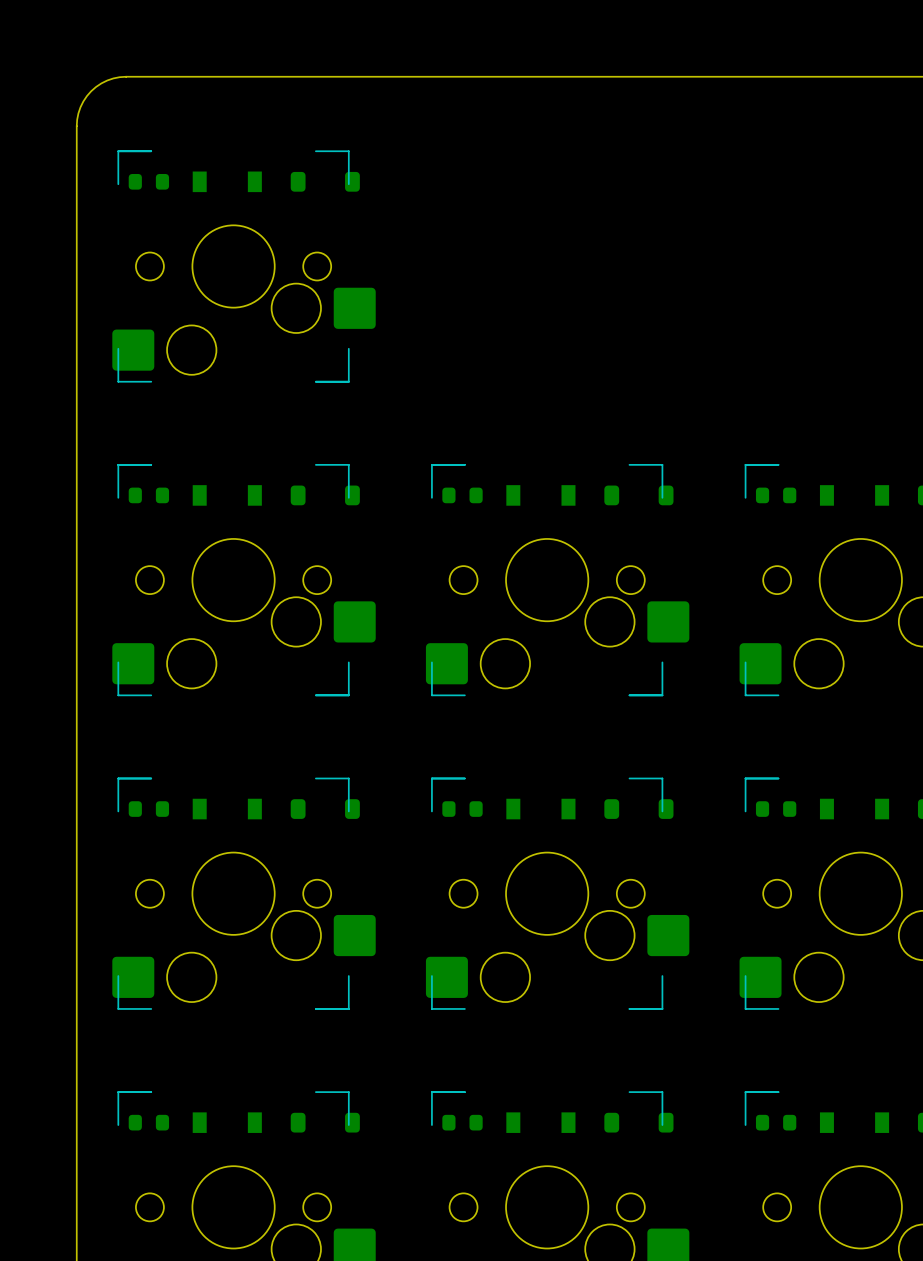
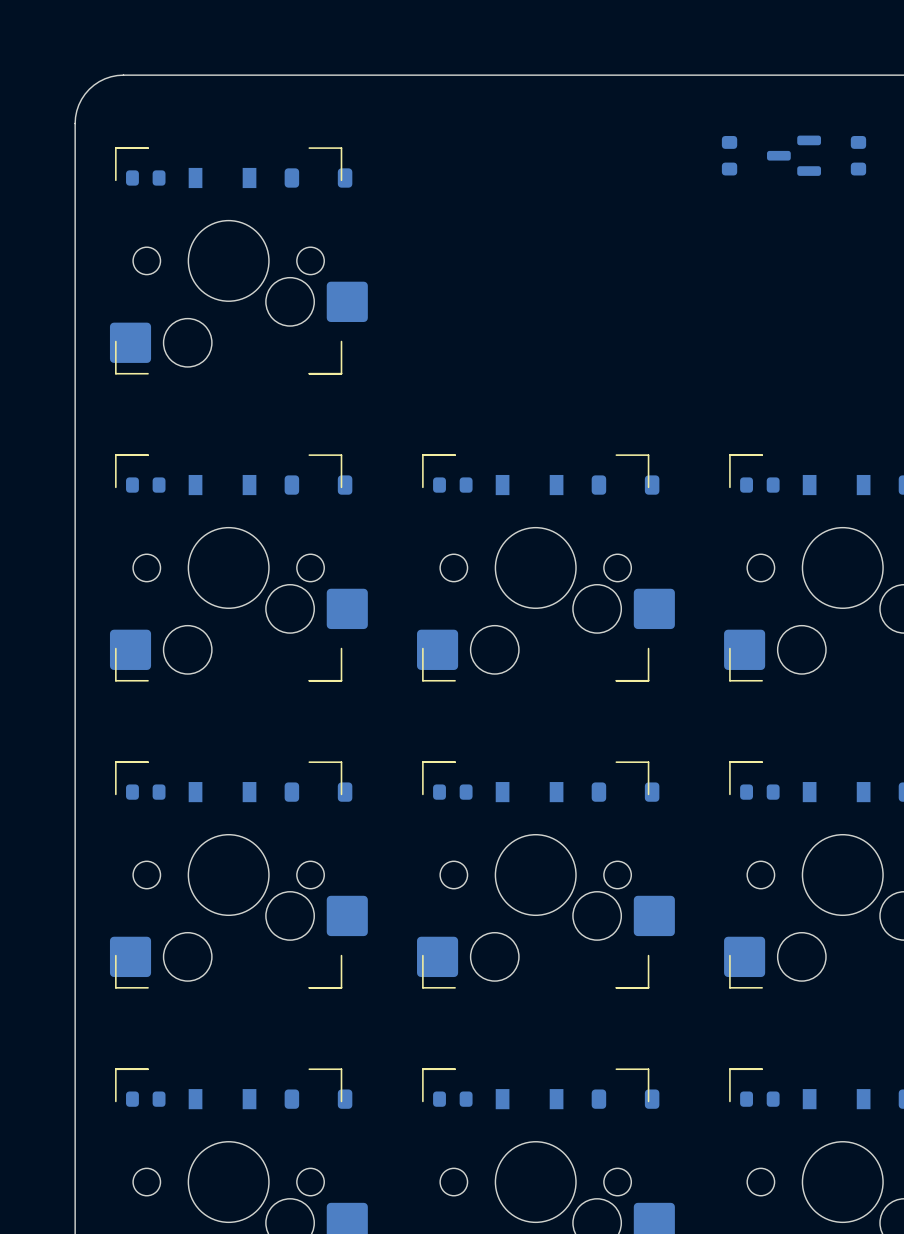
part: none -> (729, 155)
part: none -> (794, 155)
part: none -> (858, 155)

